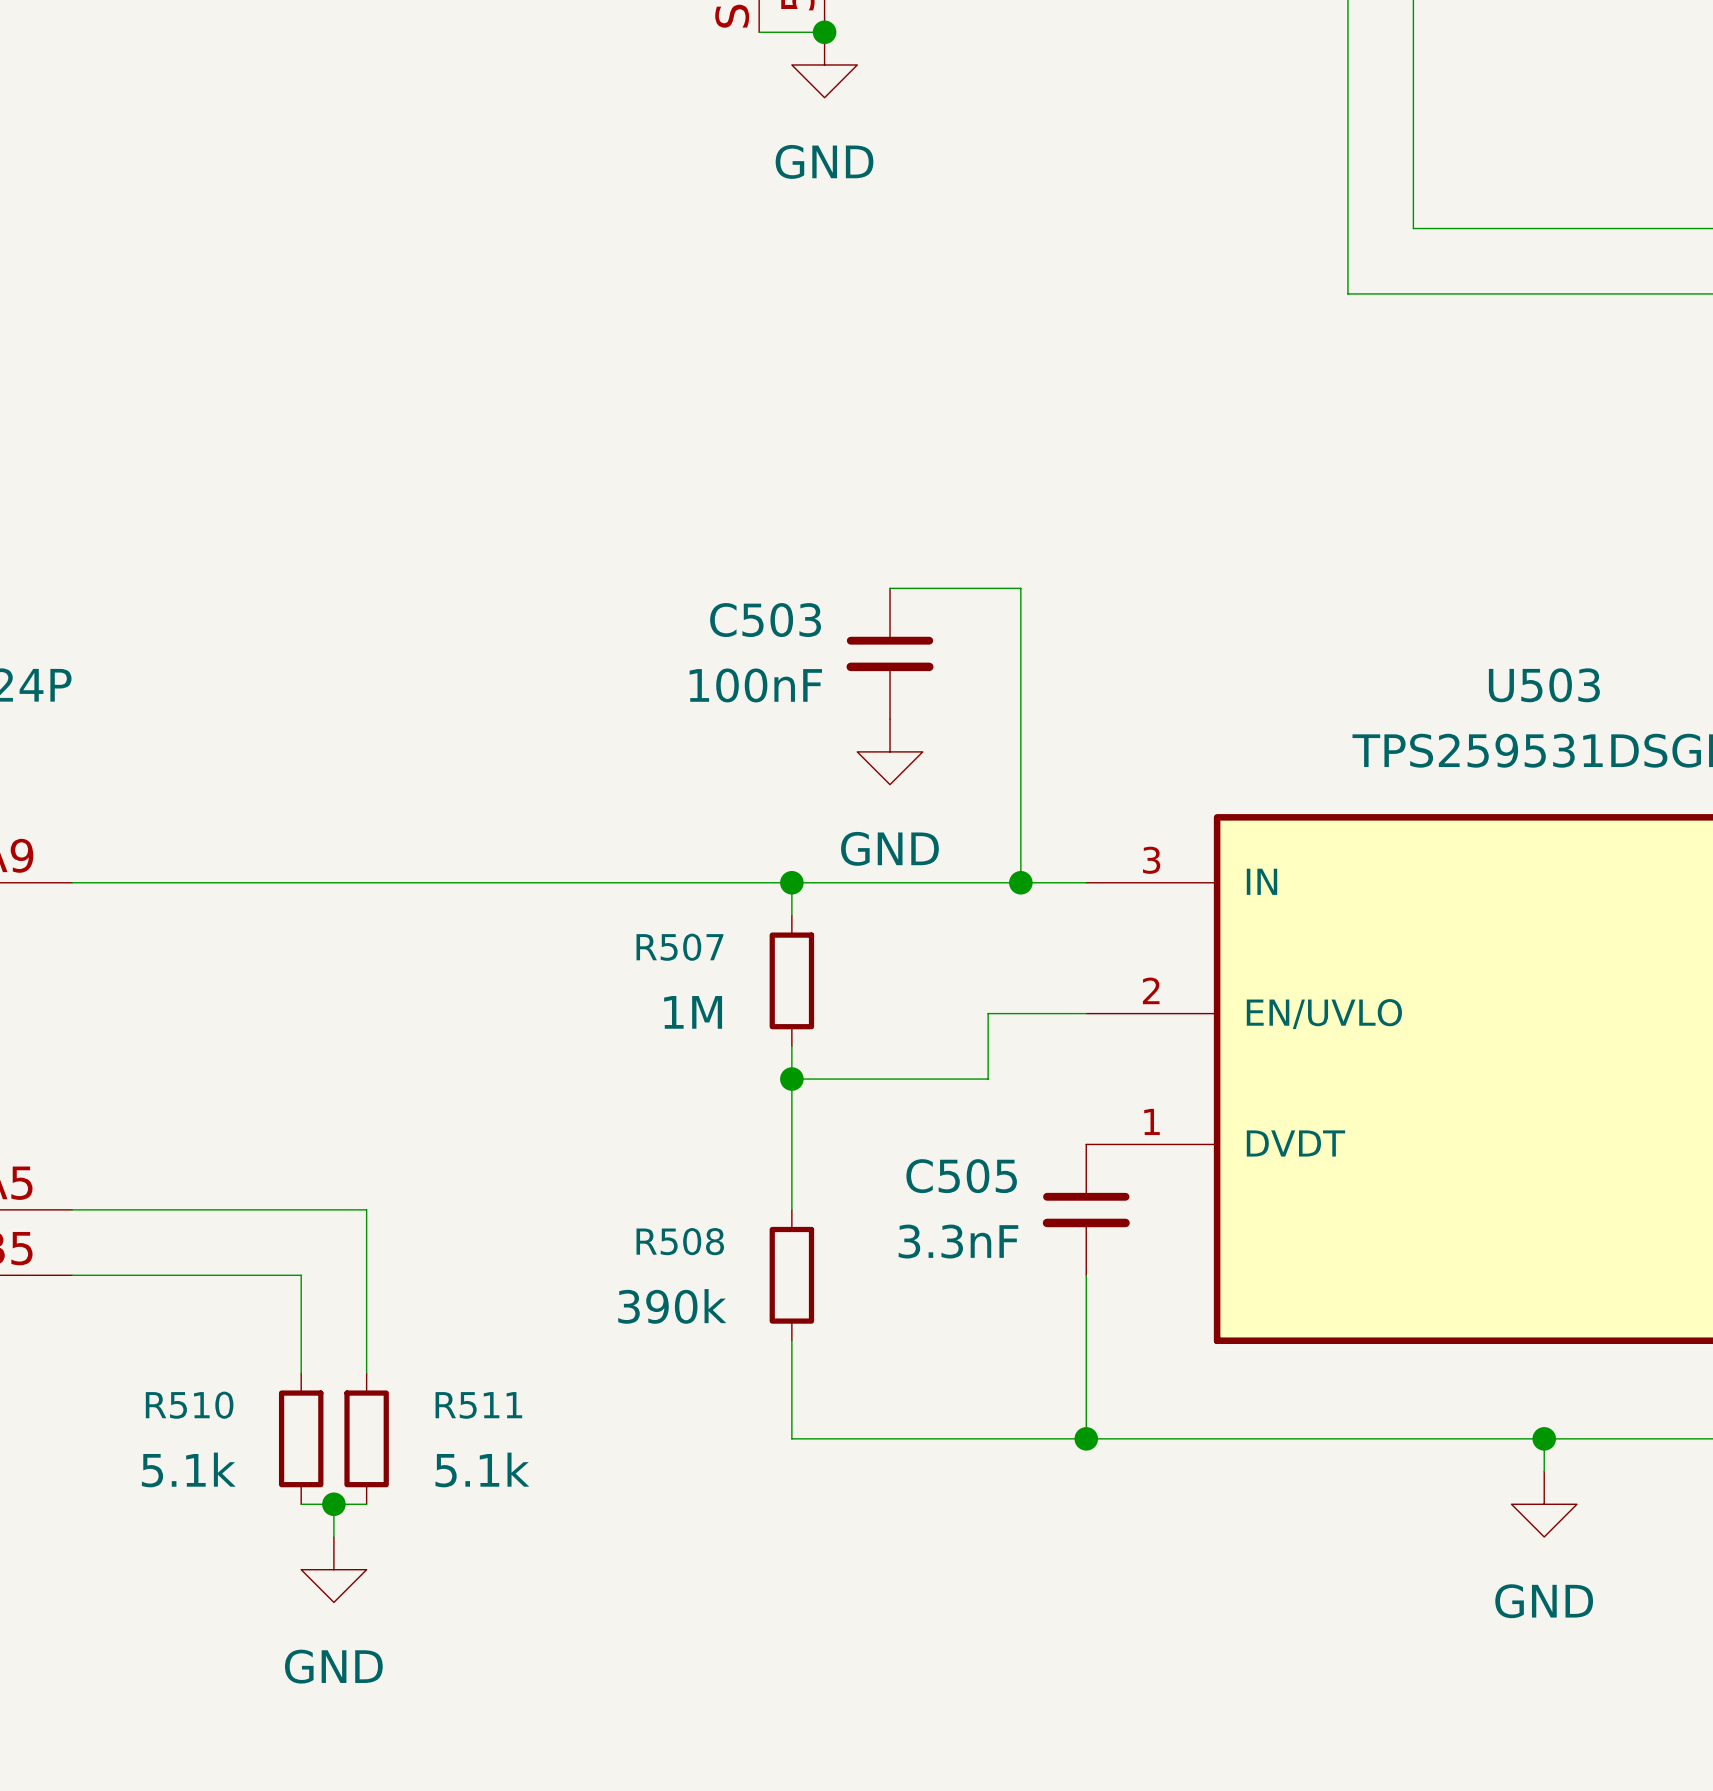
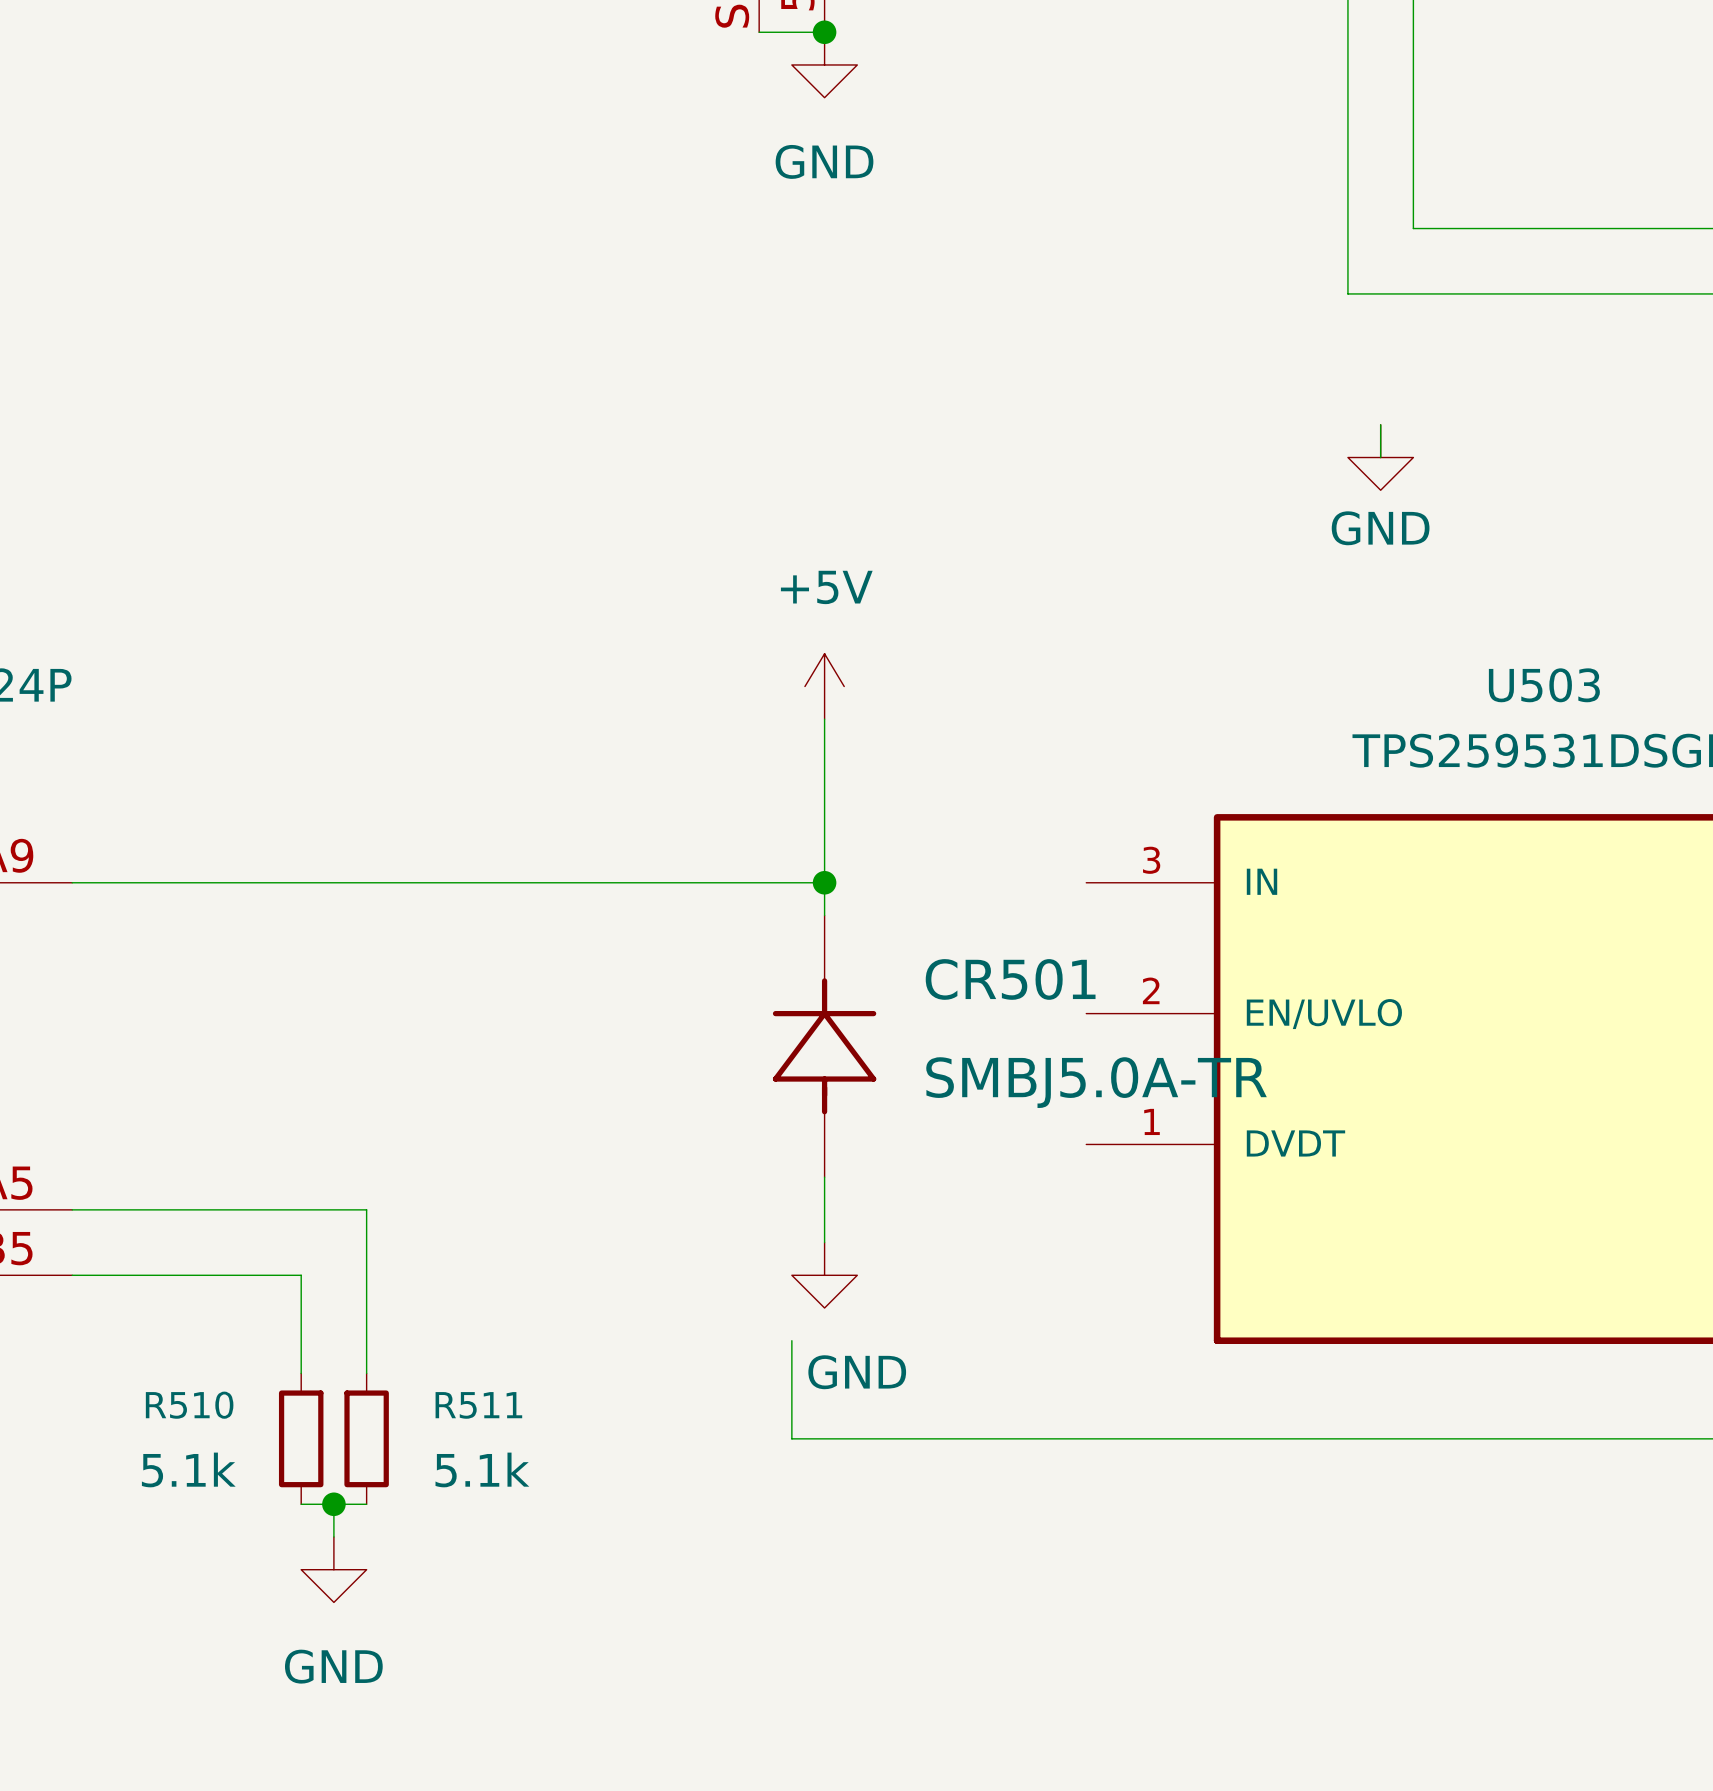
wire: none -> (1380, 424) (1380, 457)
power symbol: none -> GND (1380, 457)
wire: (890, 588) (1020, 588) (1020, 882) -> none
C503: 100nF (890, 653) -> none
power symbol: none -> +5V (824, 686)
wire: none -> (824, 719) (824, 915)
power symbol: GND (890, 751) -> none
wire: (791, 882) (791, 915) -> none
junction position: (791, 882) -> (824, 882)
wire: (824, 882) (1086, 882) -> none
junction: (1020, 882) -> none
R507: 1M (791, 980) -> none
wire: (1086, 1013) (988, 1013) (988, 1079) (791, 1079) -> none
wire: (791, 1046) (791, 1209) -> none
CR501: none -> SMBJ5.0A-TR (824, 1046)
junction: (791, 1079) -> none
wire: none -> (824, 1177) (824, 1242)
C505: 3.3nF (1086, 1209) -> none
R508: 390k (791, 1275) -> none
power symbol: none -> GND (824, 1275)
wire: (1086, 1275) (1086, 1438) -> none
junction: (1086, 1438) -> none
wire: (1544, 1438) (1544, 1471) -> none
junction: (1544, 1438) -> none
power symbol: GND (1544, 1504) -> none

